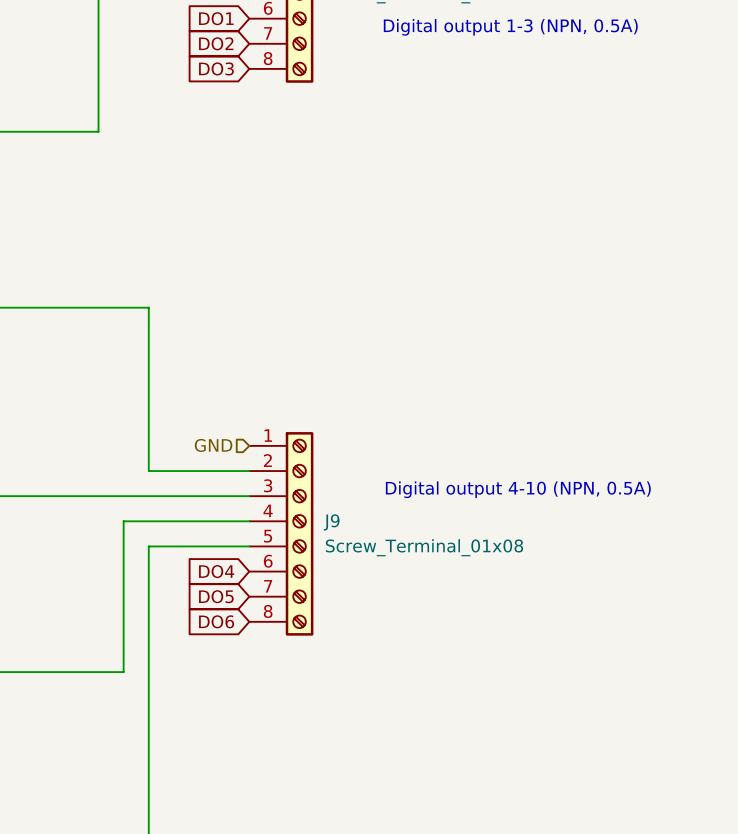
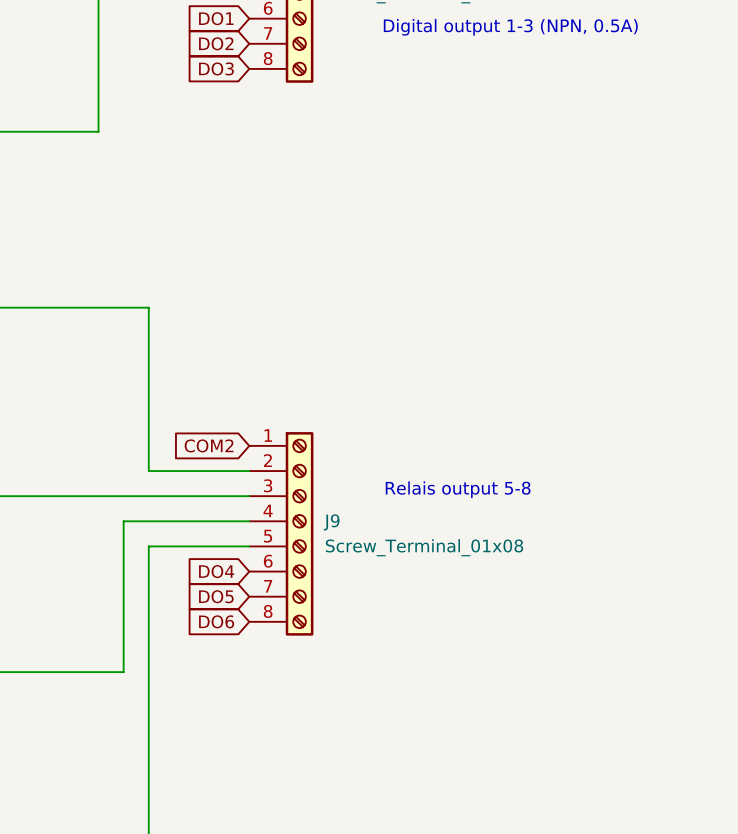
global label: none -> COM2 (209, 445)
hierarchical label: GND (213, 445) -> none
text: none -> Relais output 5-8 (458, 489)
text: Digital output 4-10 (NPN, 0.5A) (518, 489) -> none

